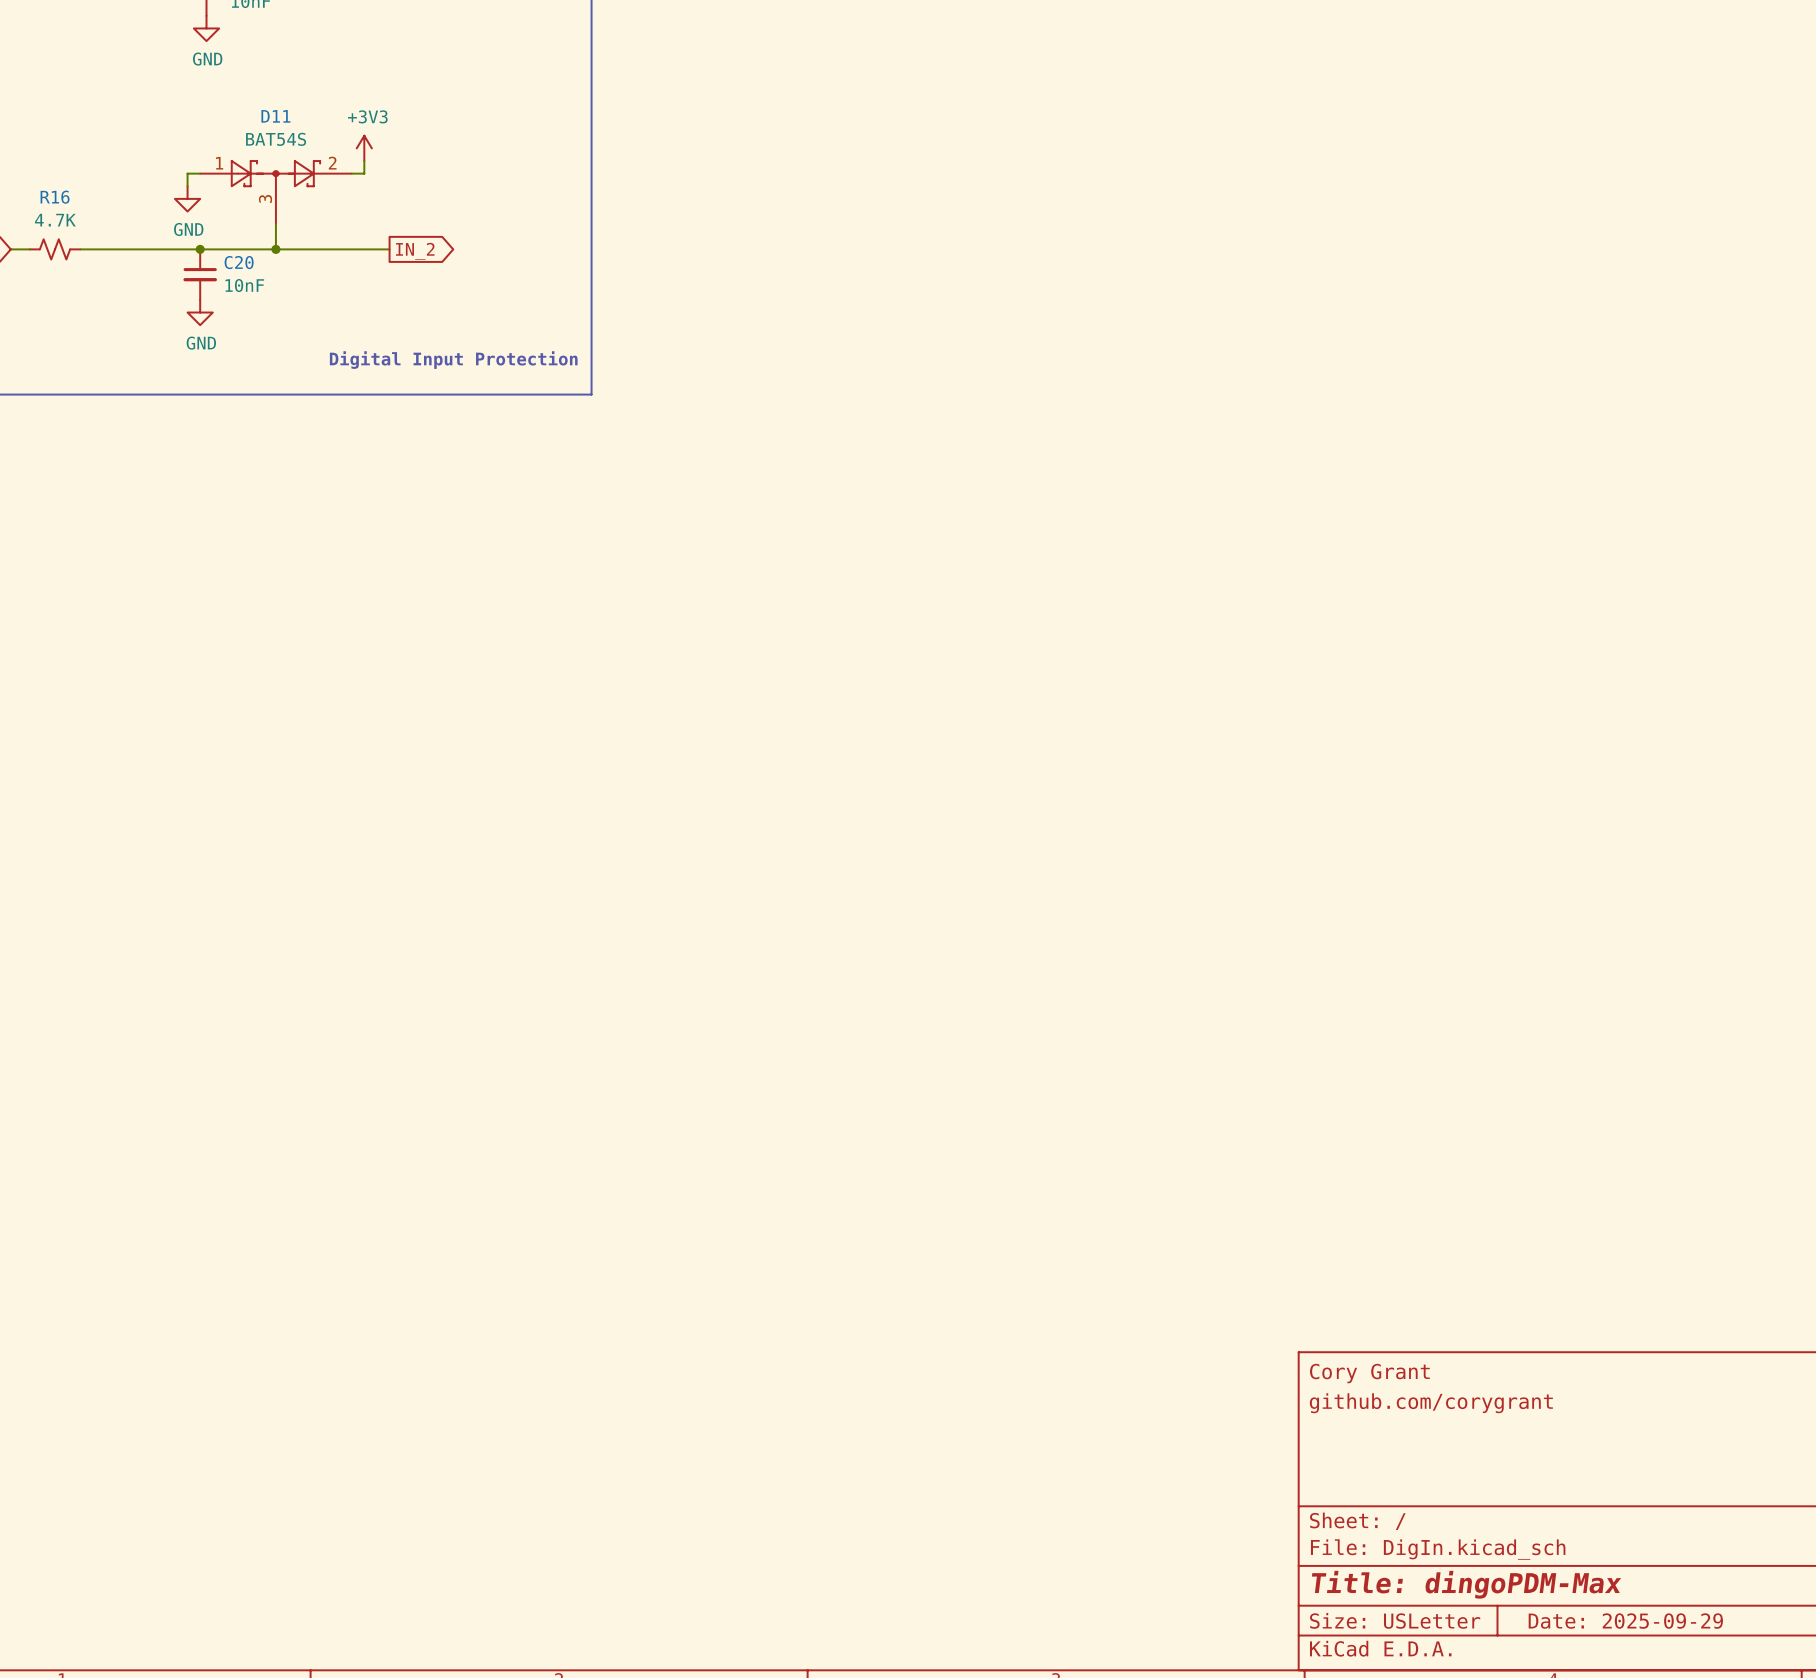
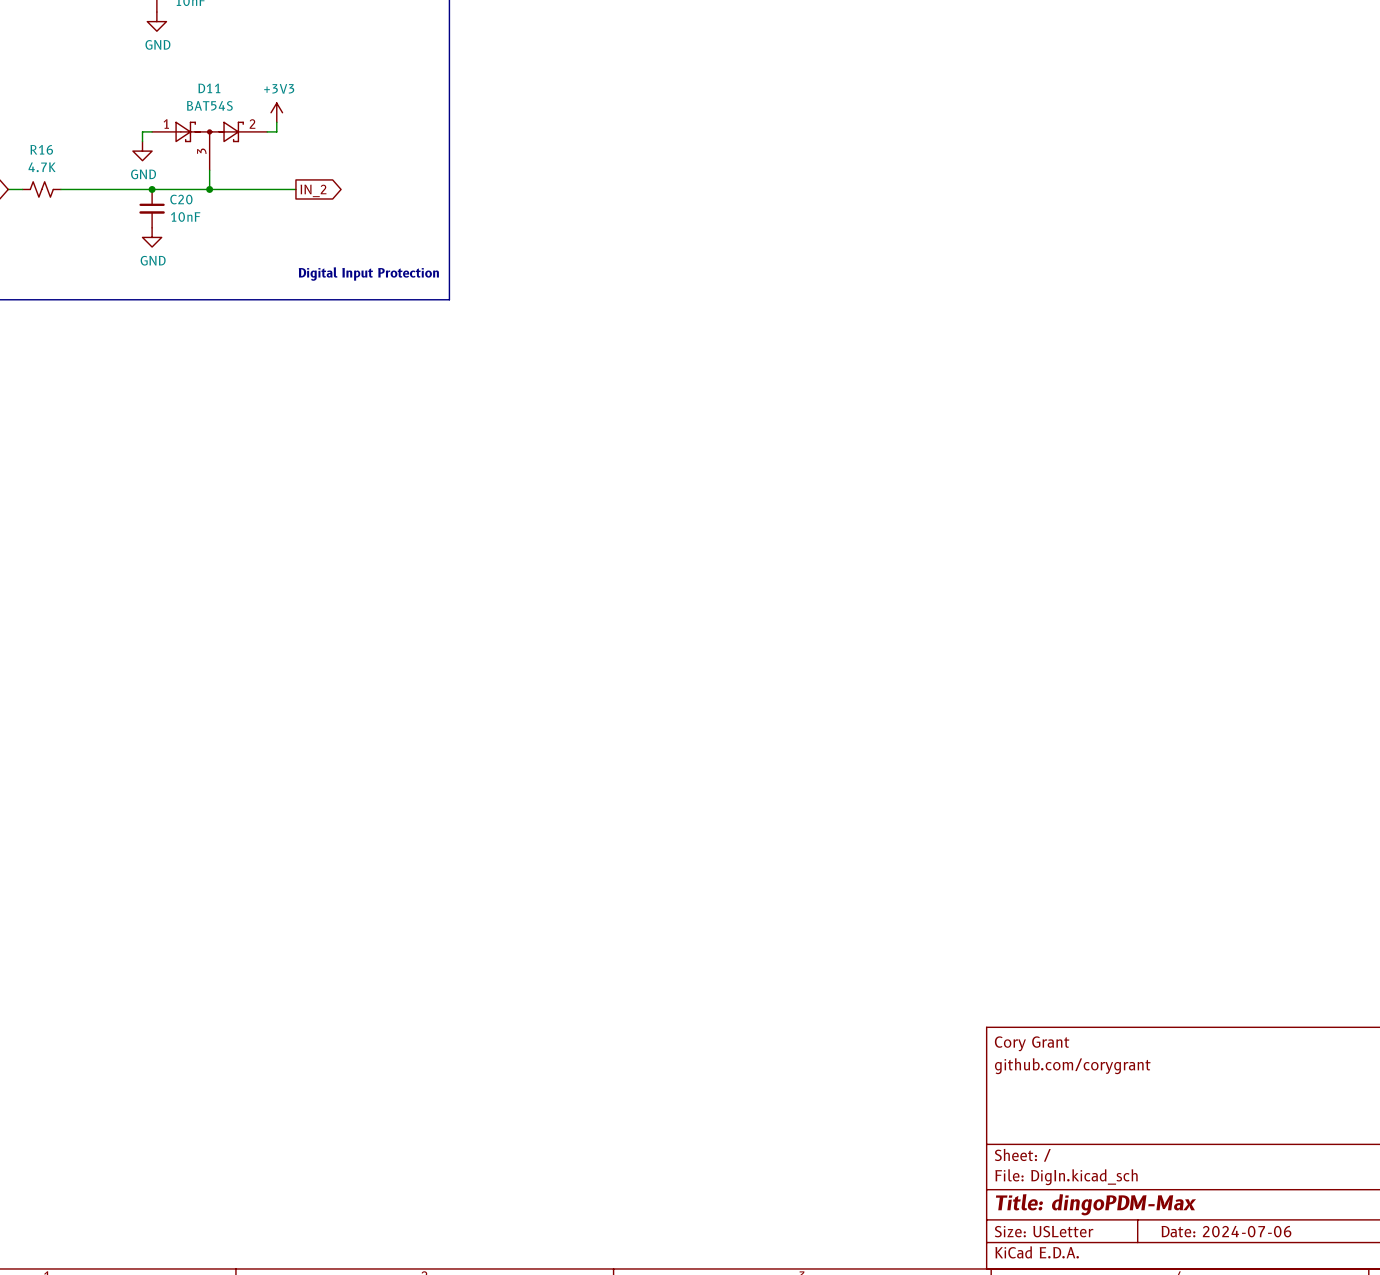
title block: Date: 2025-09-29 (1625, 1621) -> Date: 2024-07-06 (1226, 1231)

